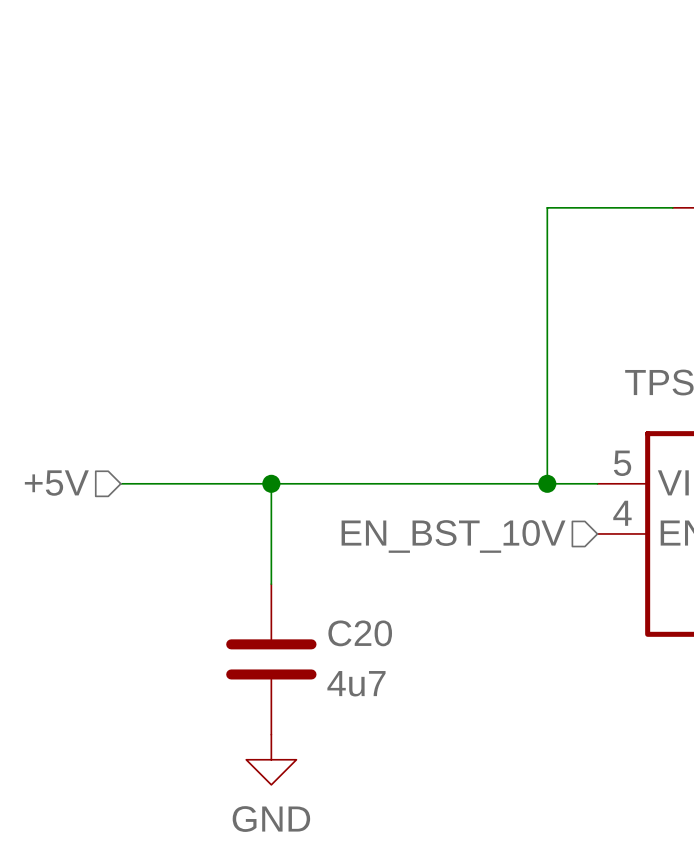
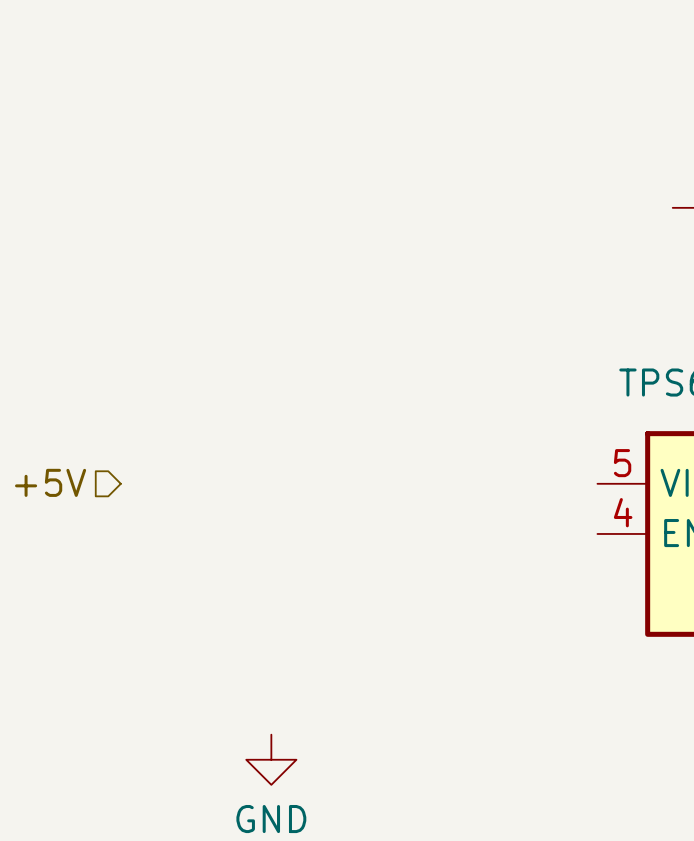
wire: (672, 207) (547, 207) (547, 483) -> none
wire: (120, 483) (597, 483) -> none
wire: (271, 483) (271, 584) -> none
junction: (271, 483) -> none
junction: (547, 483) -> none
hierarchical label: EN_BST_10V (453, 536) -> none
C20: 4u7 (271, 659) -> none

